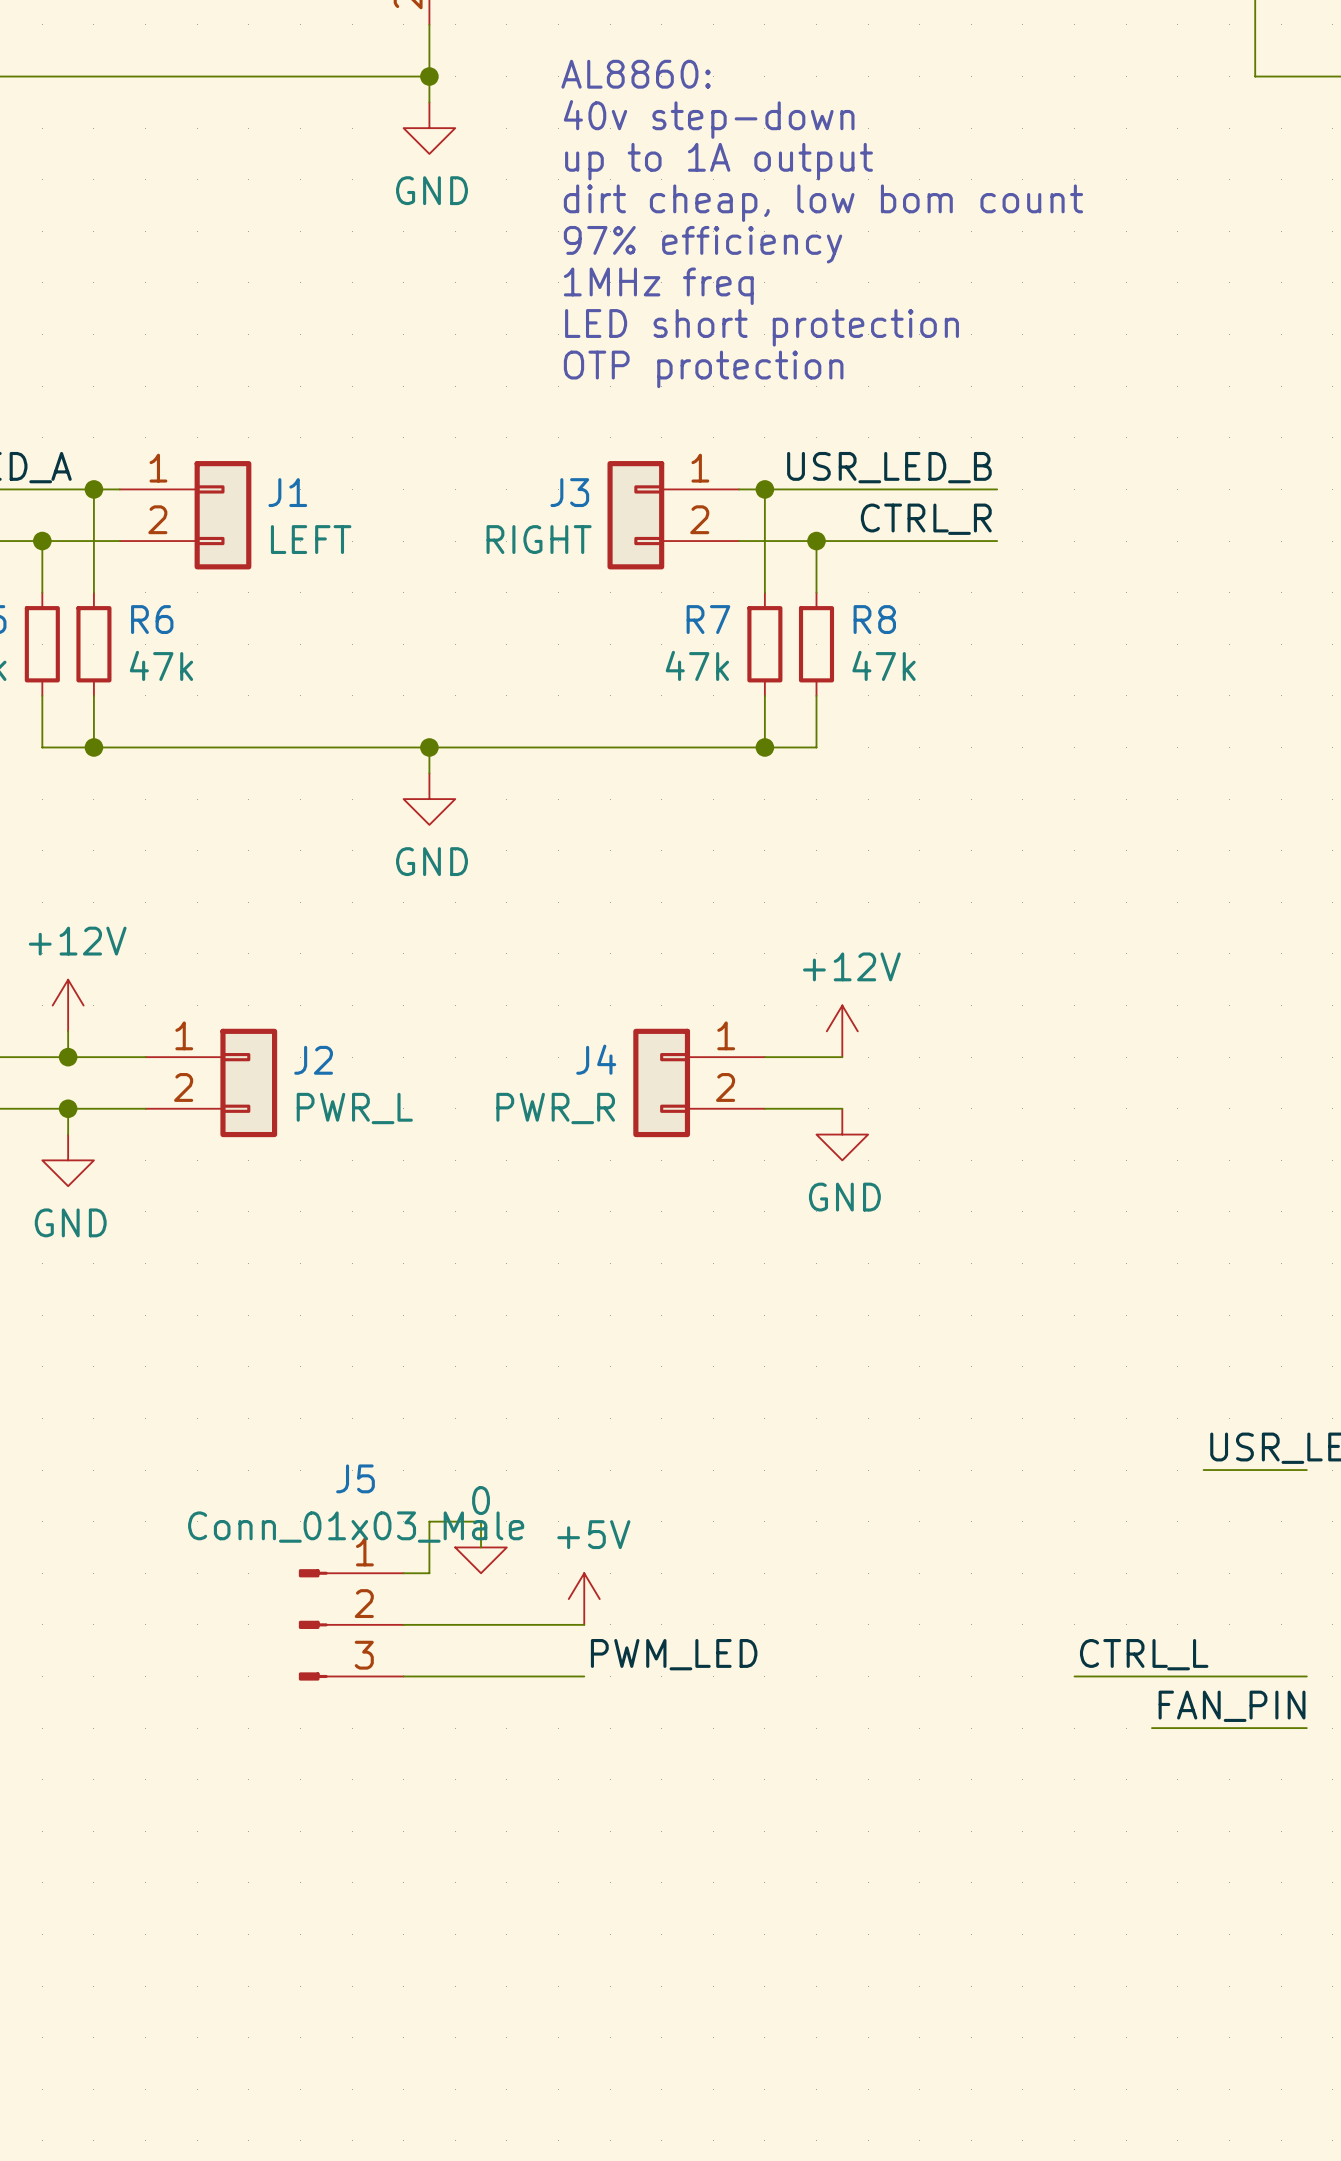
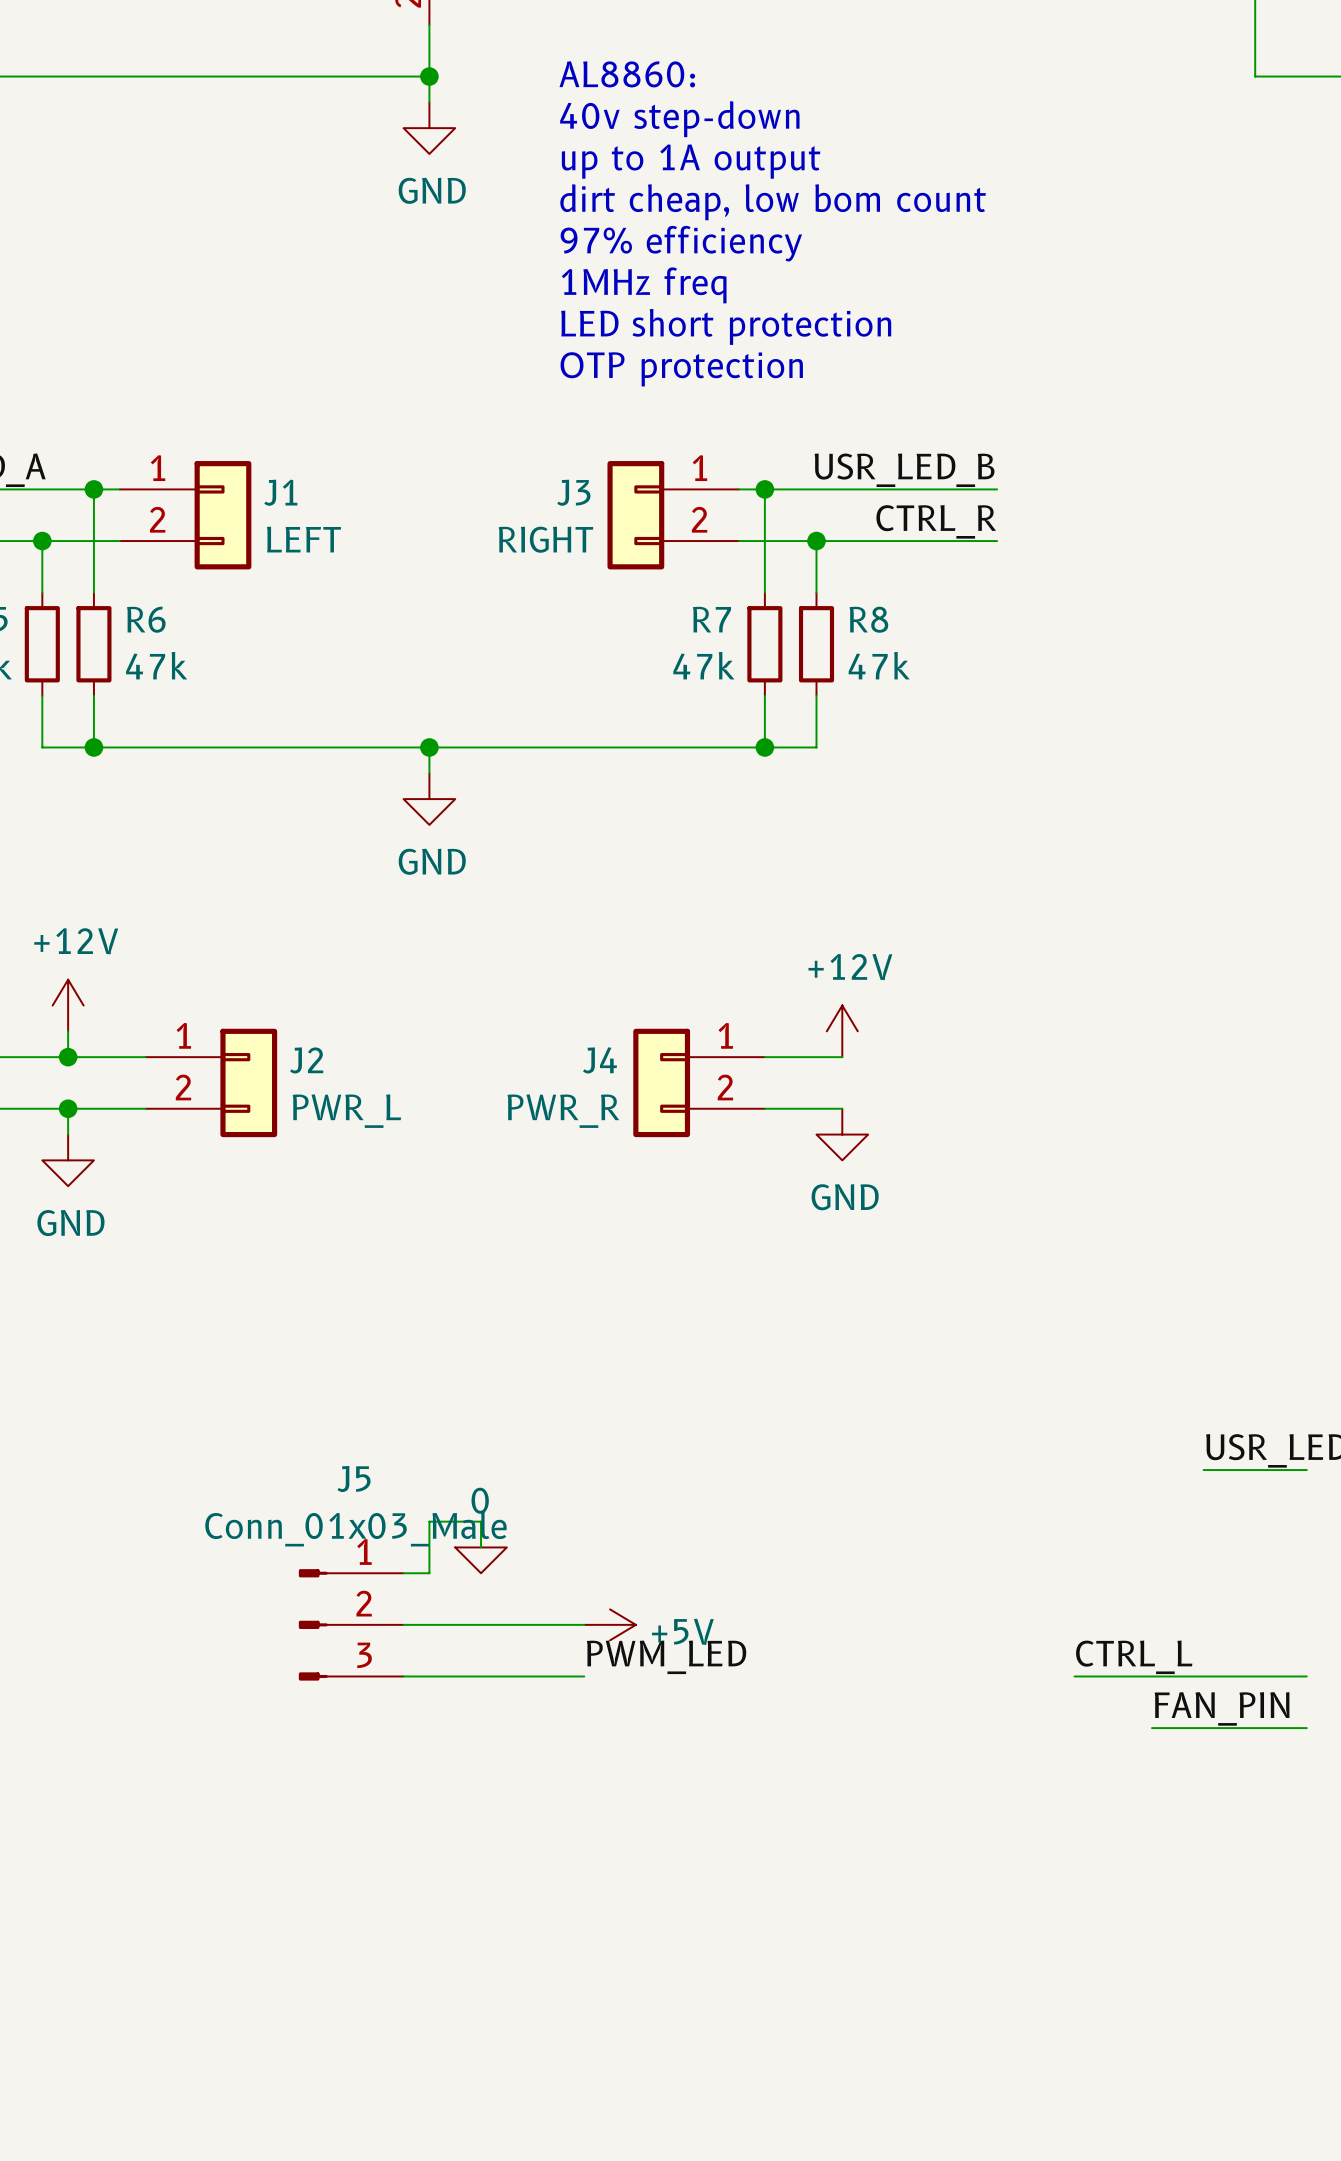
power symbol rotation: 0° (584, 1599) -> 90° clockwise (610, 1624)
power symbol position: +5V (584, 1599) -> +5V (610, 1624)

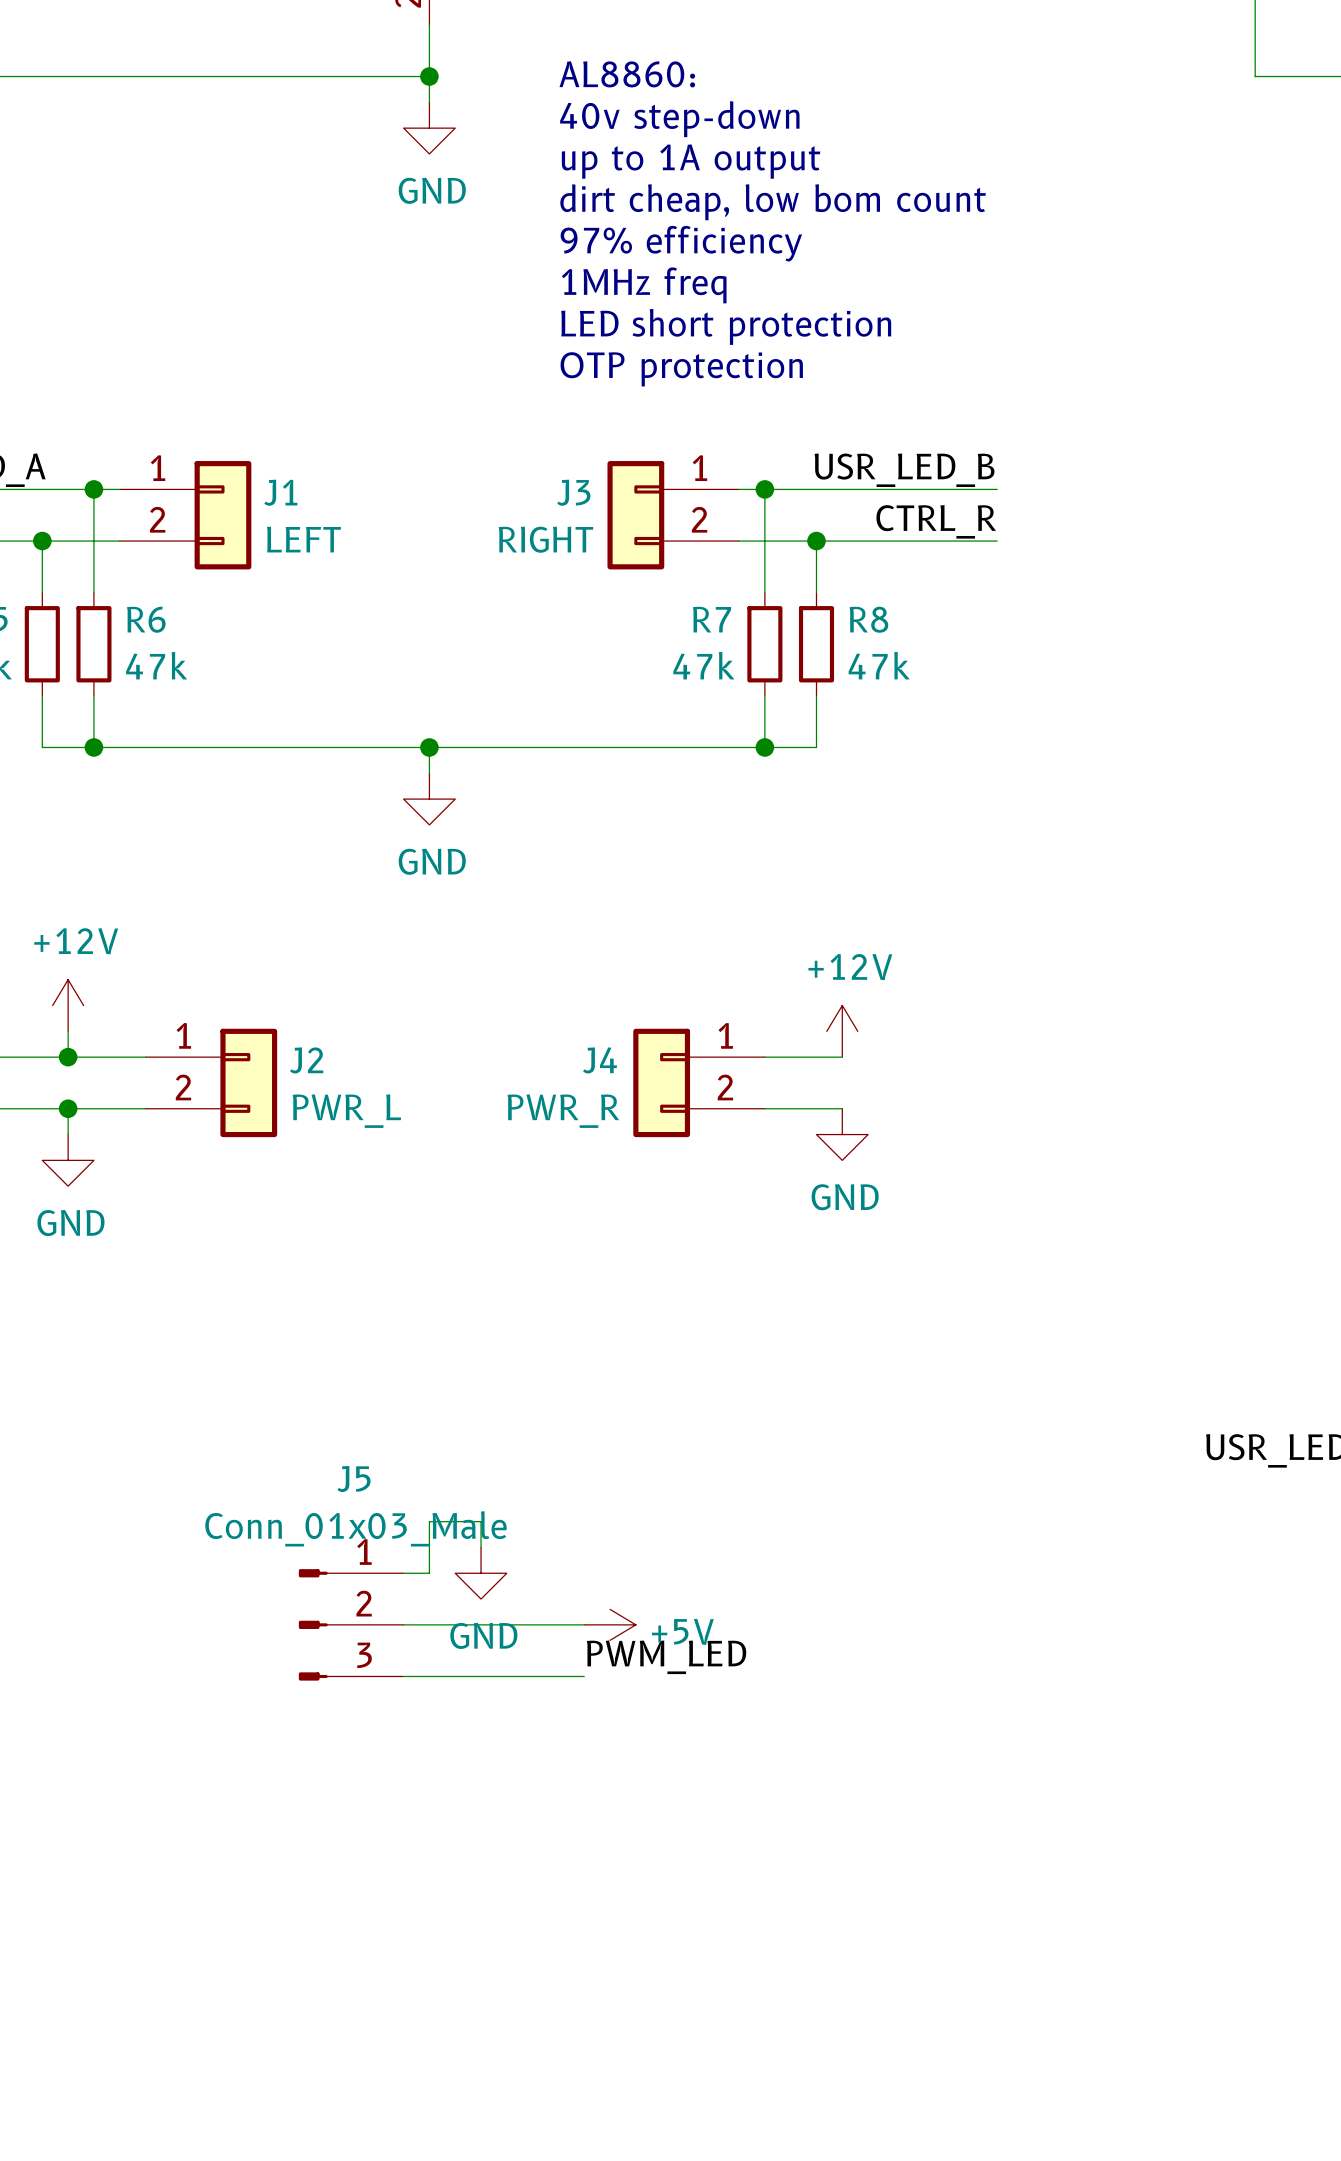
wire: (1203, 1470) (1306, 1470) -> none
power symbol: 0 (481, 1560) -> GND (481, 1573)
label: CTRL_L (1134, 1657) -> none
wire: (1074, 1676) (1306, 1676) -> none
label: FAN_PIN (1222, 1708) -> none
wire: (1151, 1728) (1306, 1728) -> none

